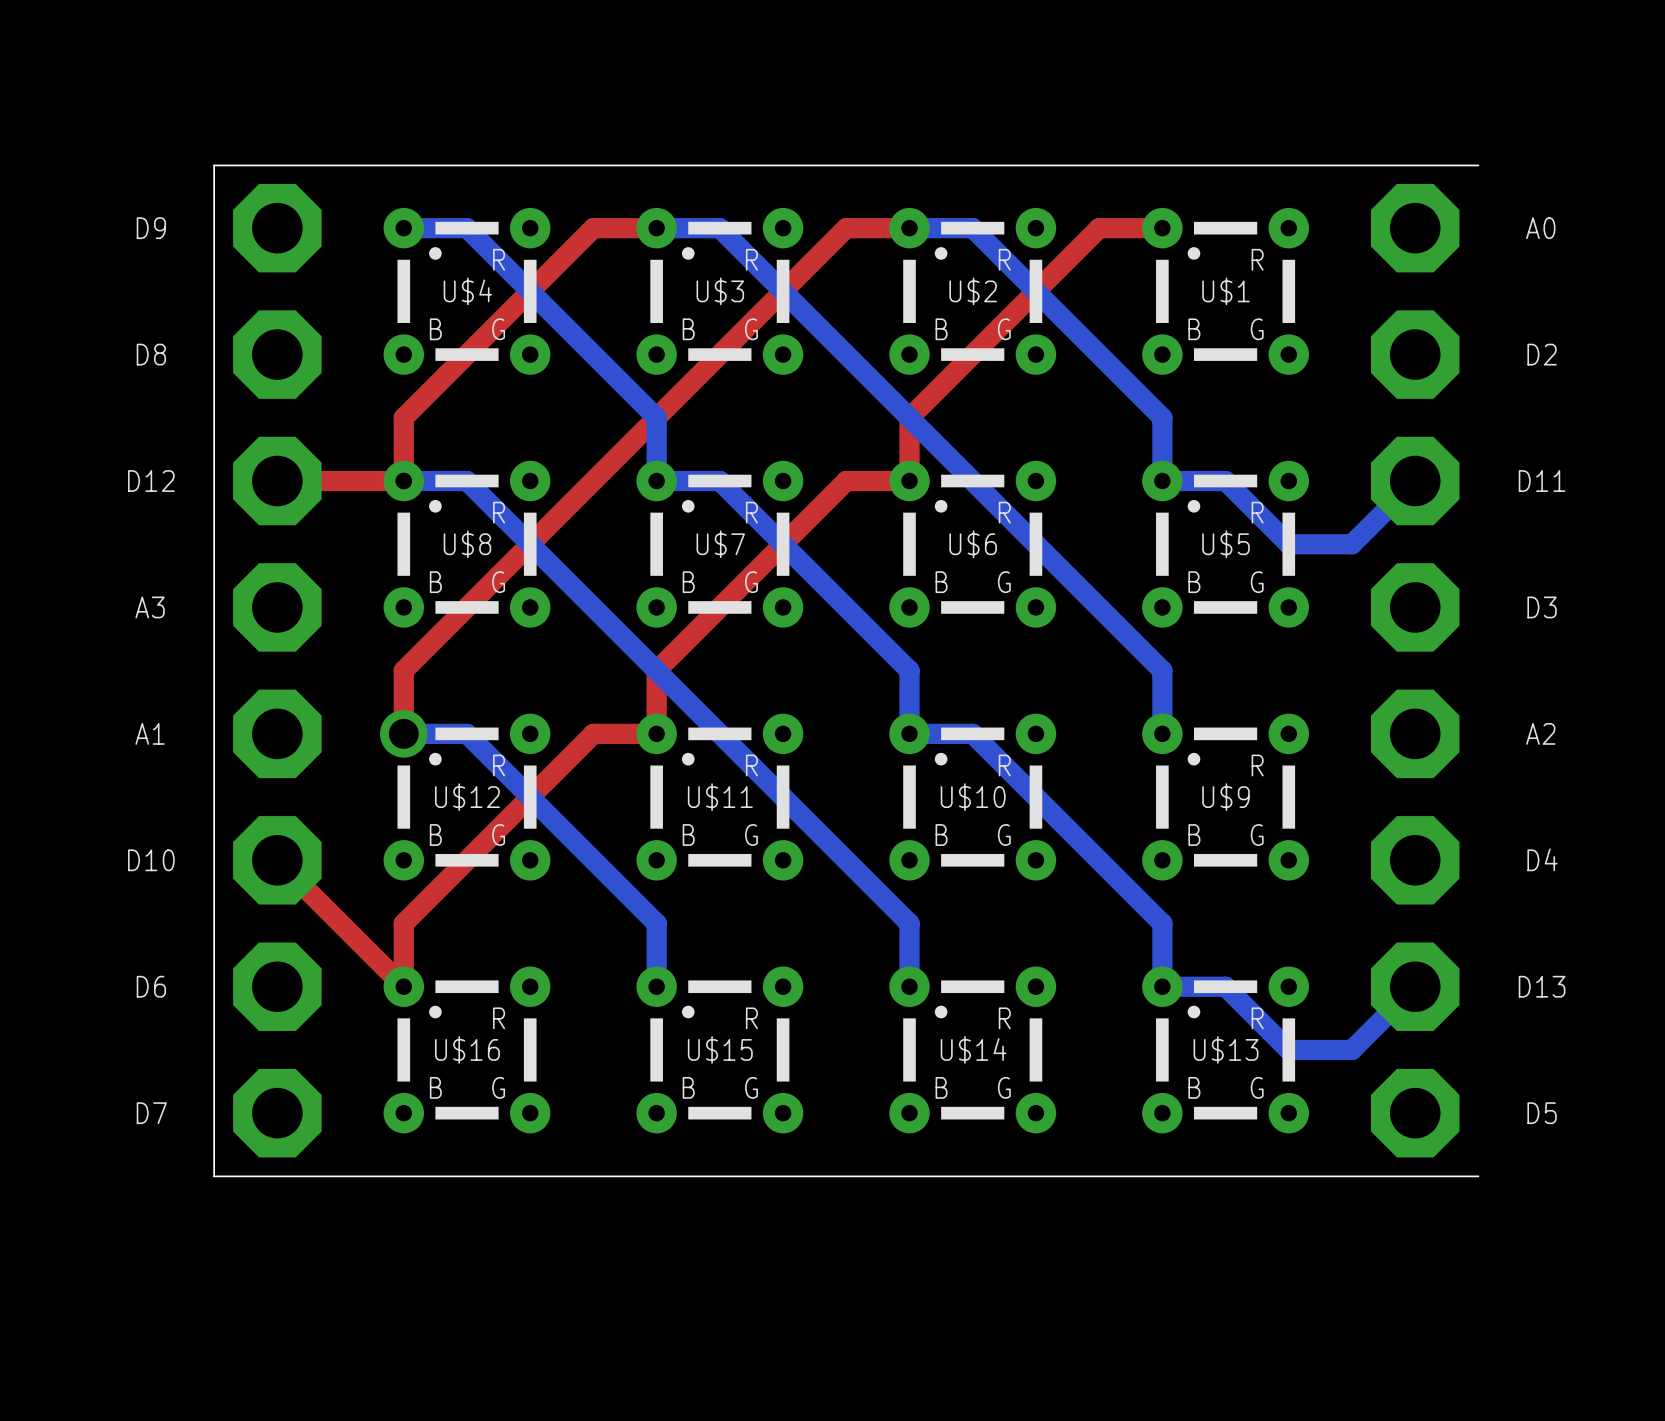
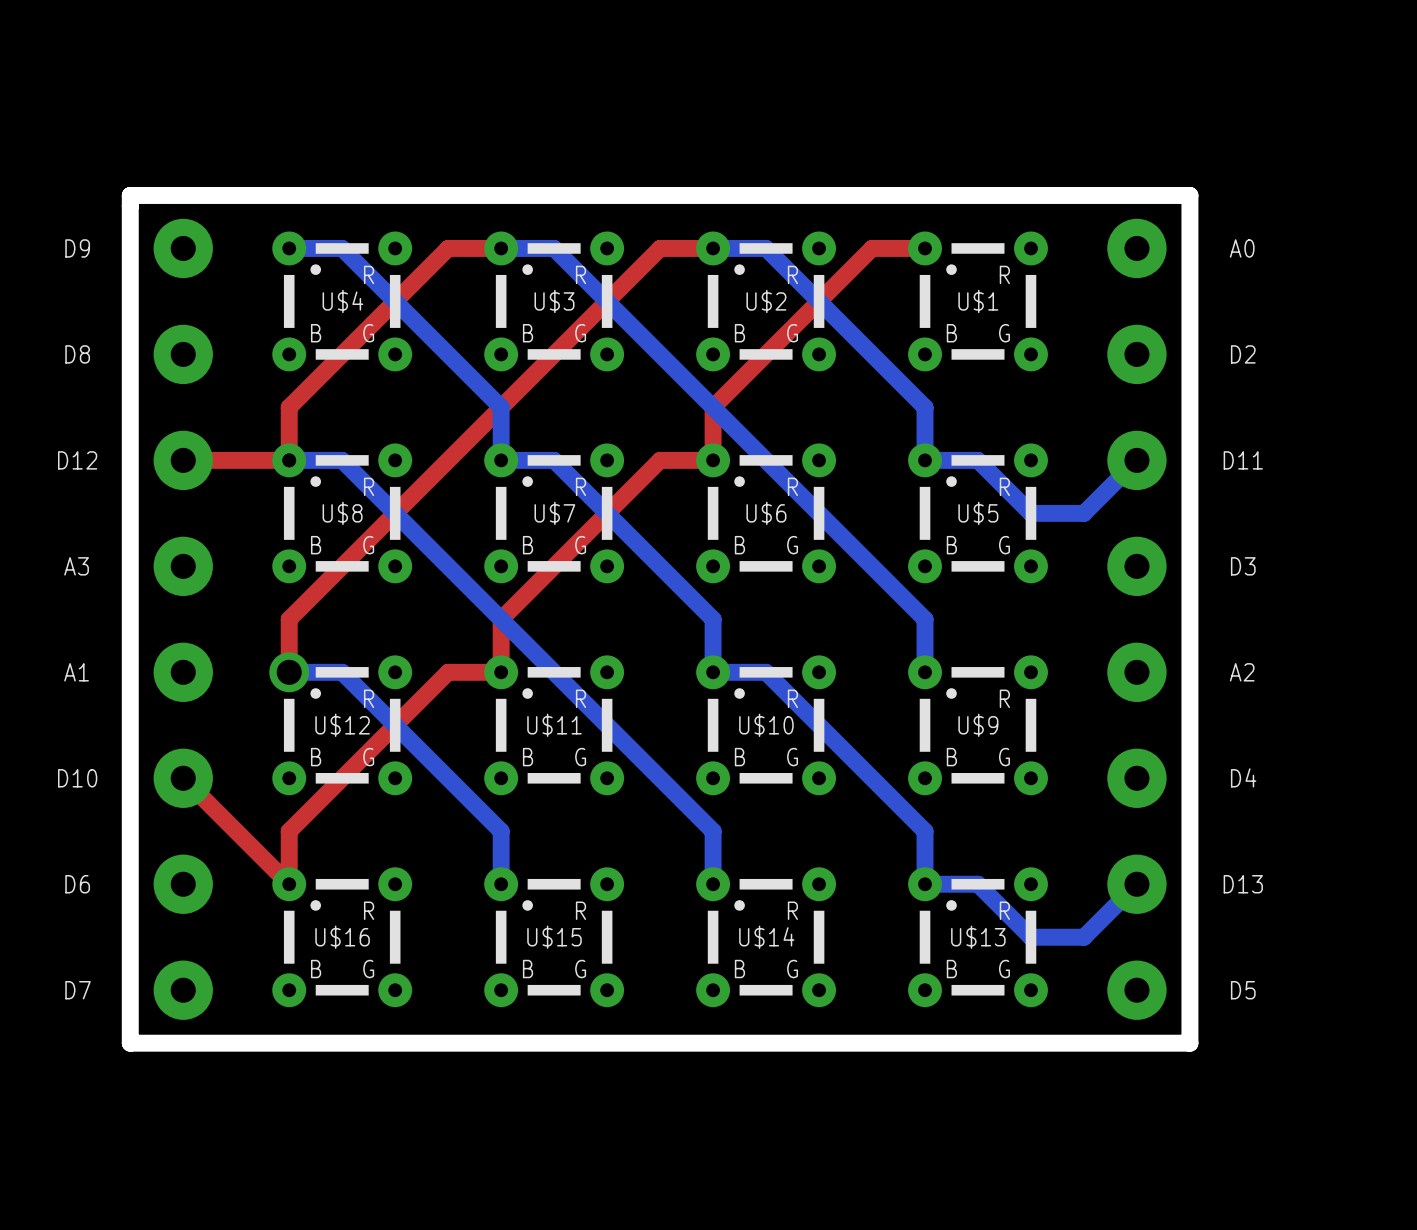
part footprint: [233, 183, 322, 1158] -> [153, 218, 213, 1020]
part footprint: [1370, 183, 1460, 1158] -> [1107, 218, 1167, 1020]
board edge: none -> (1189, 1043) (1189, 195) (130, 195) (130, 1043)
board edge width: thin (1478, 1176) (214, 1176) -> thick (1189, 1043) (130, 1043)

